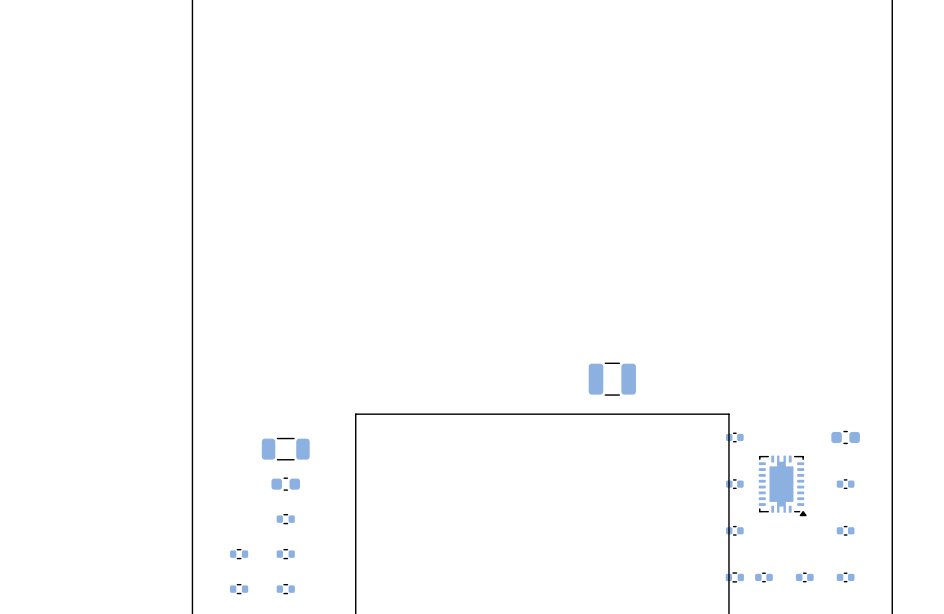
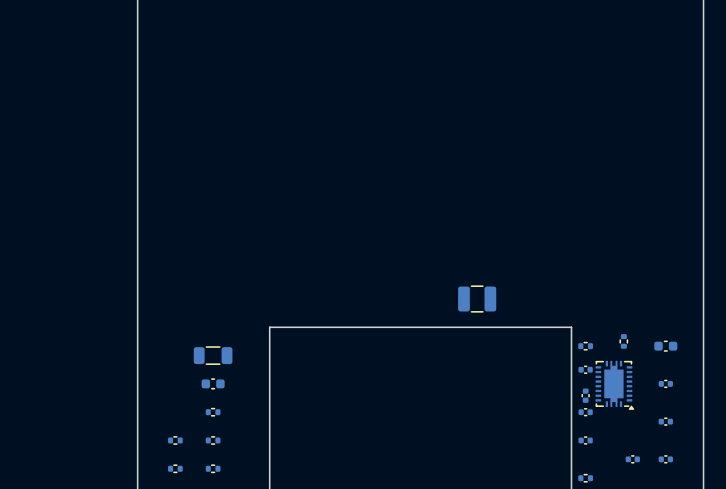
part: none -> (623, 341)
part footprint: [725, 432, 744, 443] -> [578, 342, 593, 351]
part: none -> (585, 369)
part: (734, 484) -> none
part: none -> (585, 395)
part: none -> (585, 412)
part: (734, 530) -> none
part: none -> (585, 440)
part: (734, 577) -> none
part: (763, 577) -> none
part: none -> (585, 478)

